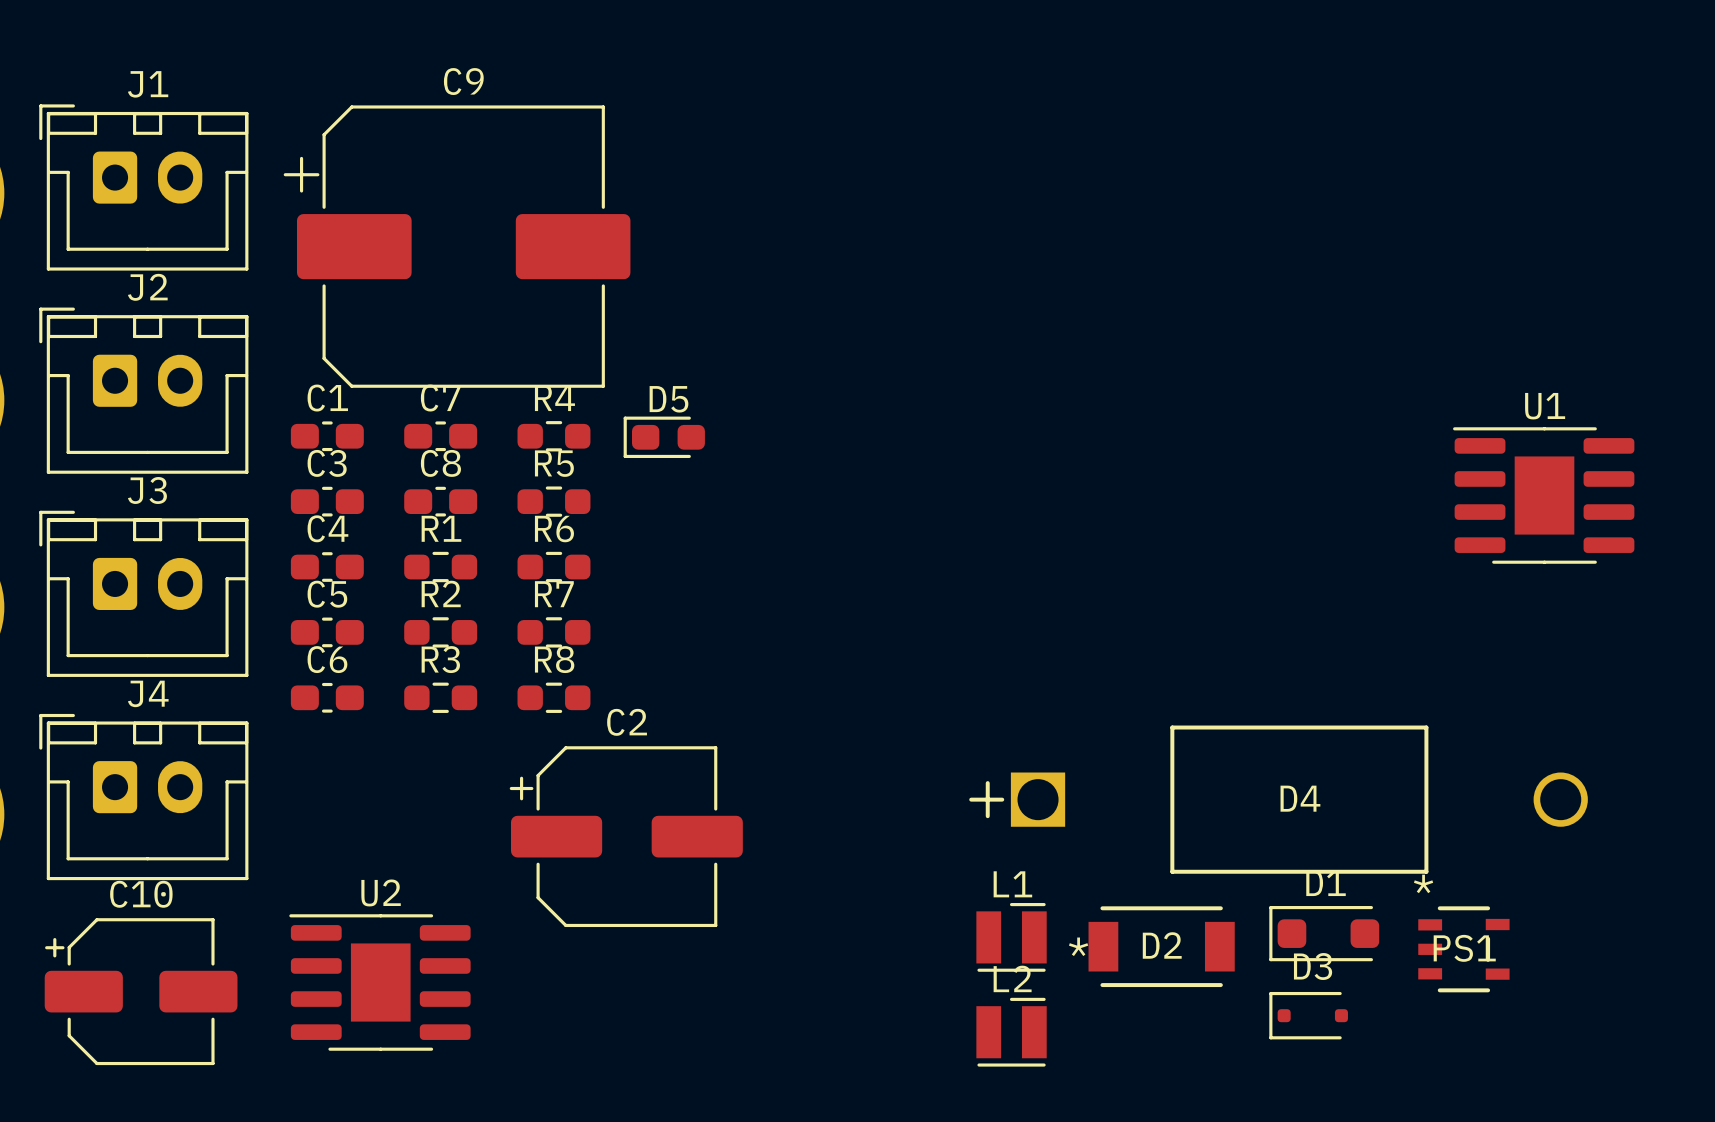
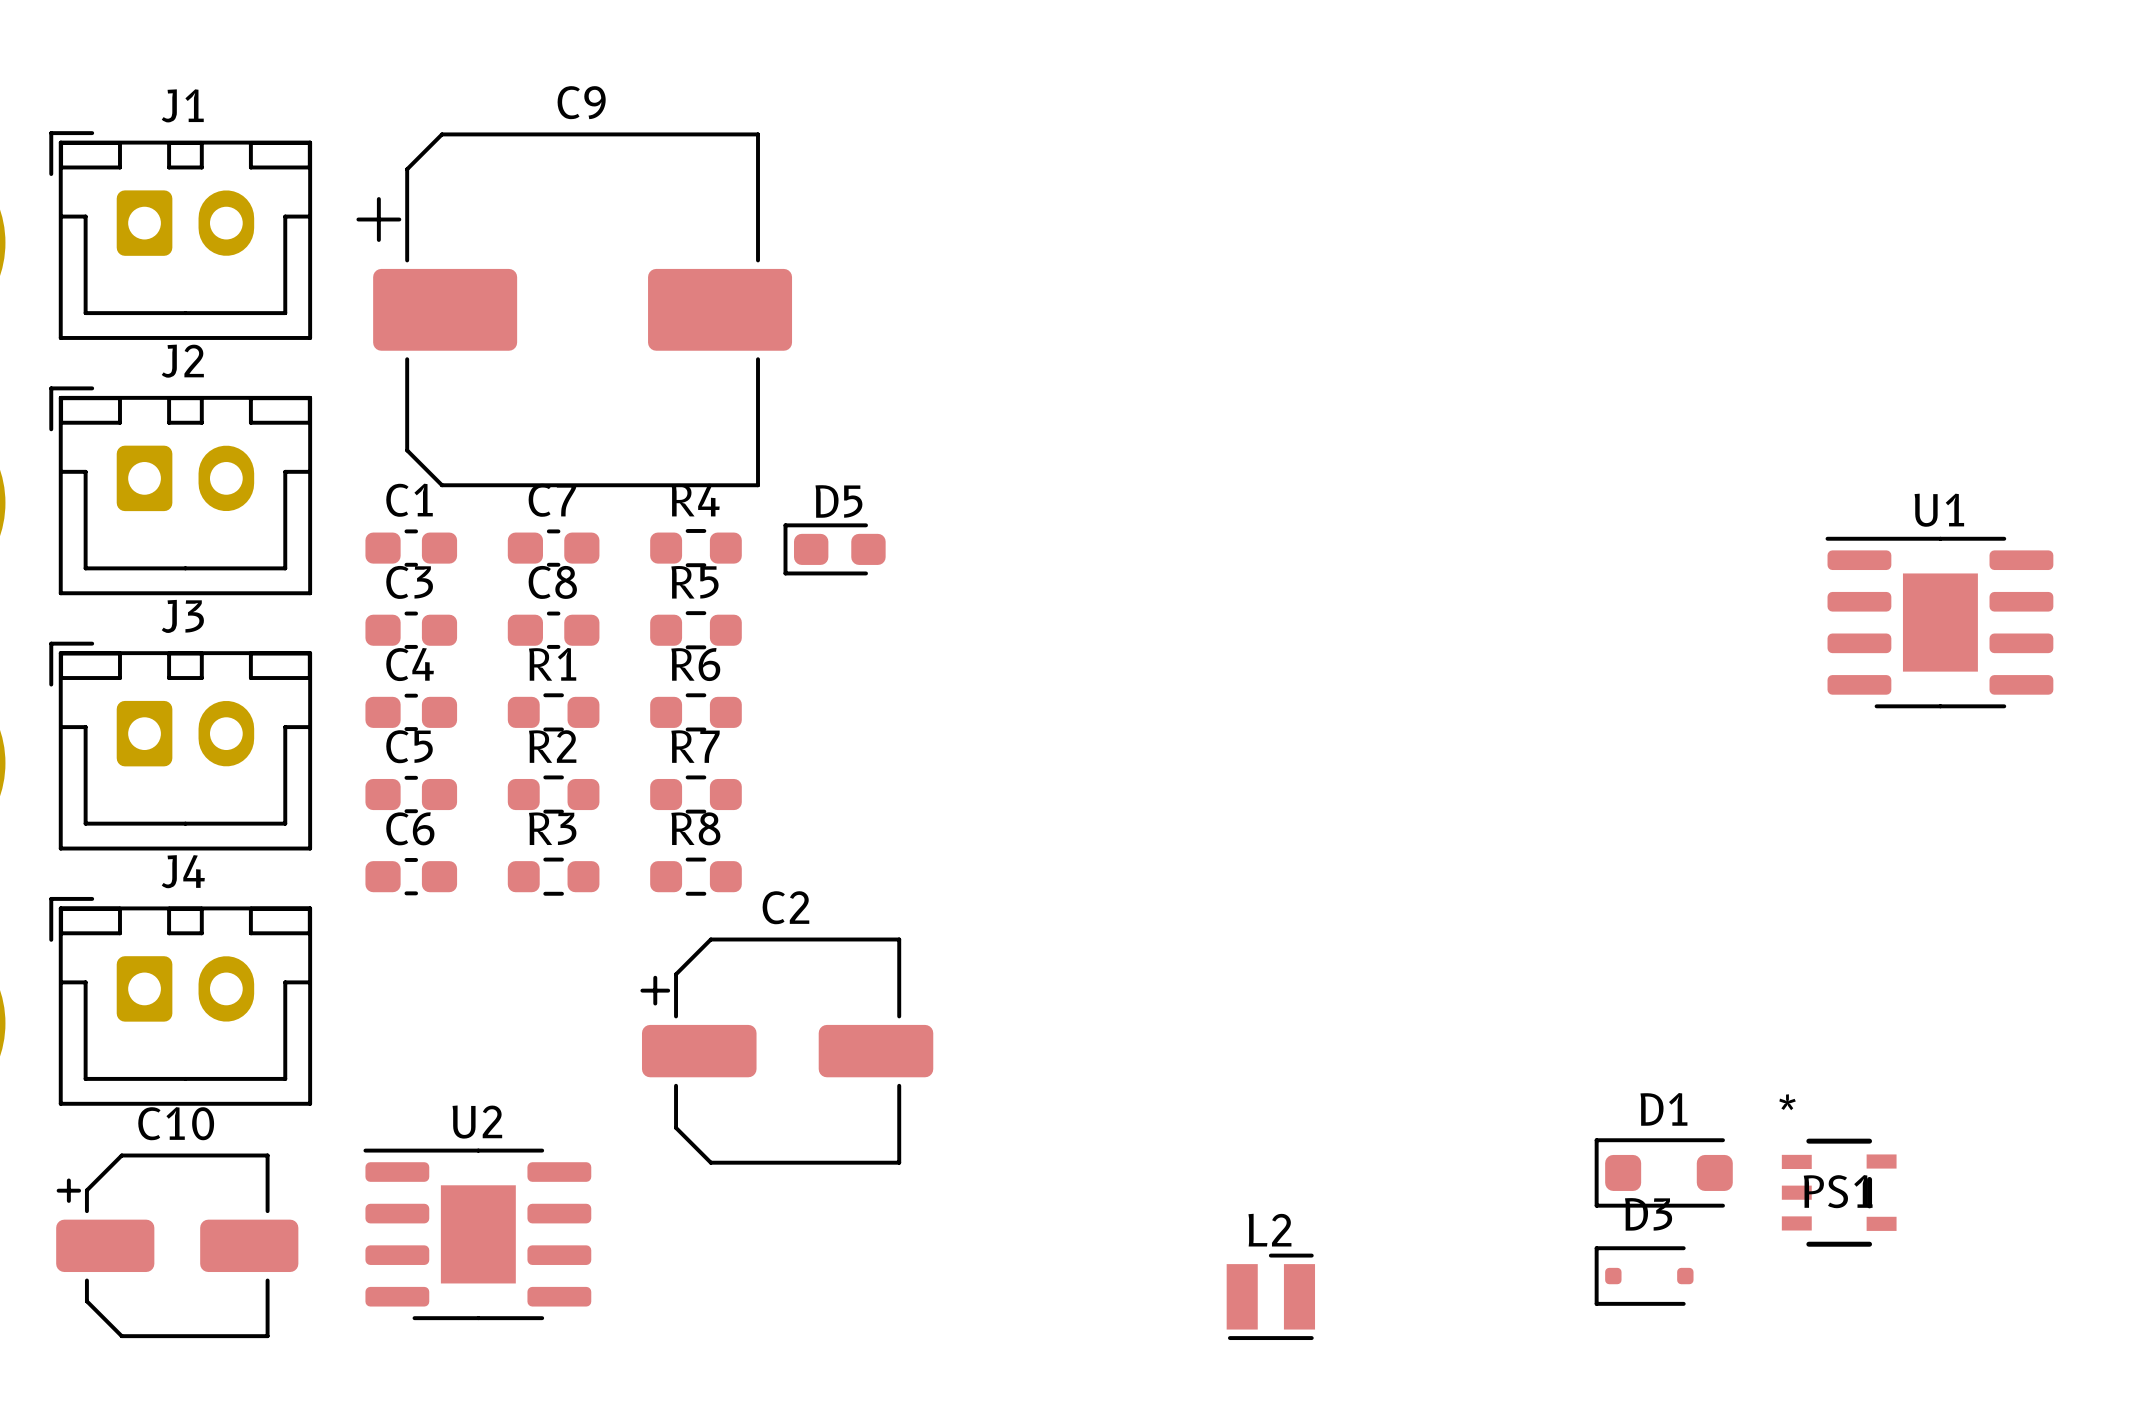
D4: (1278, 799) -> none
L1: (1011, 937) -> none
D2: (1161, 946) -> none

